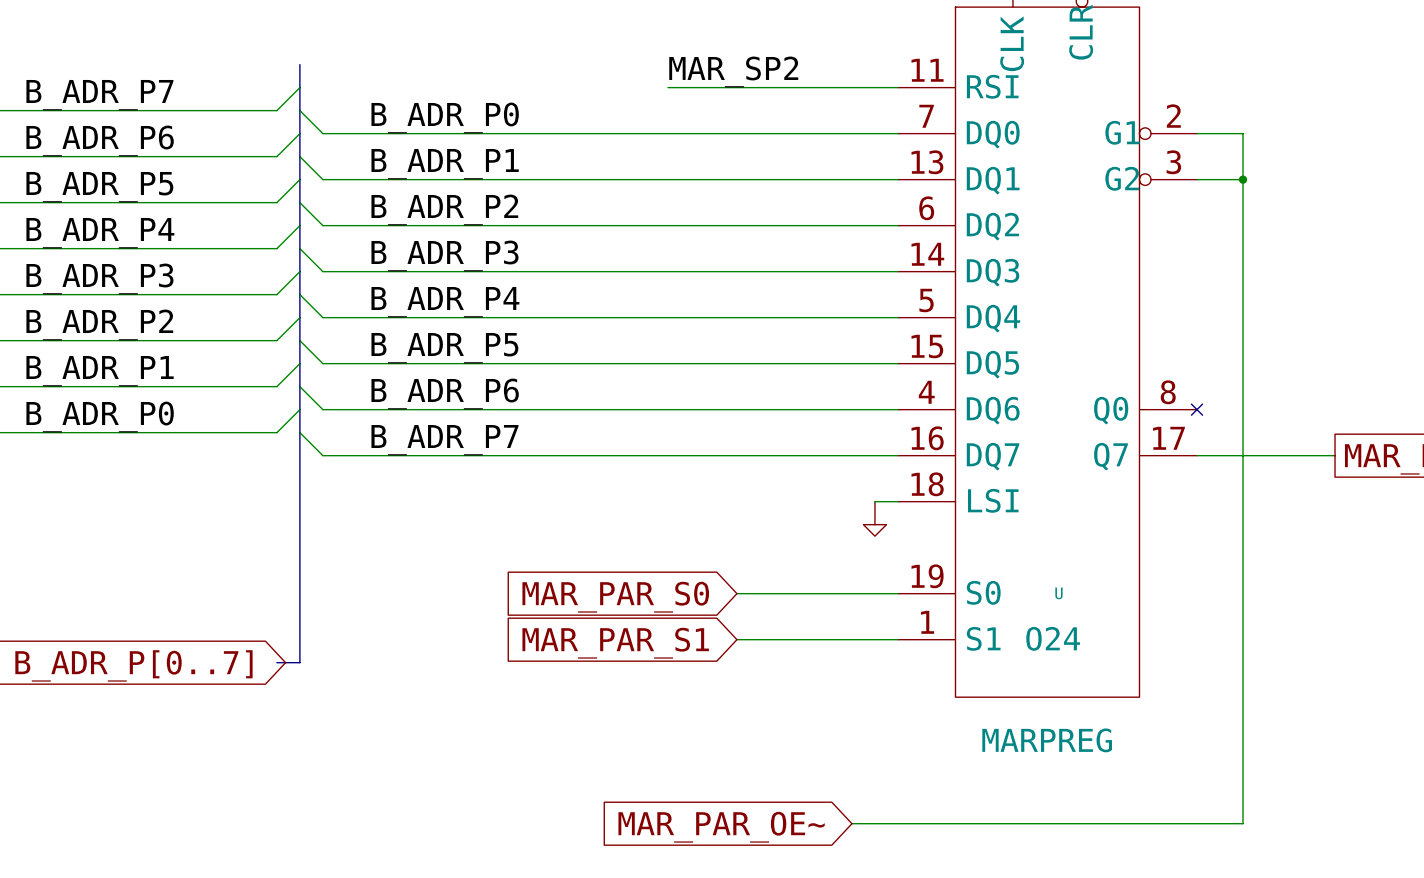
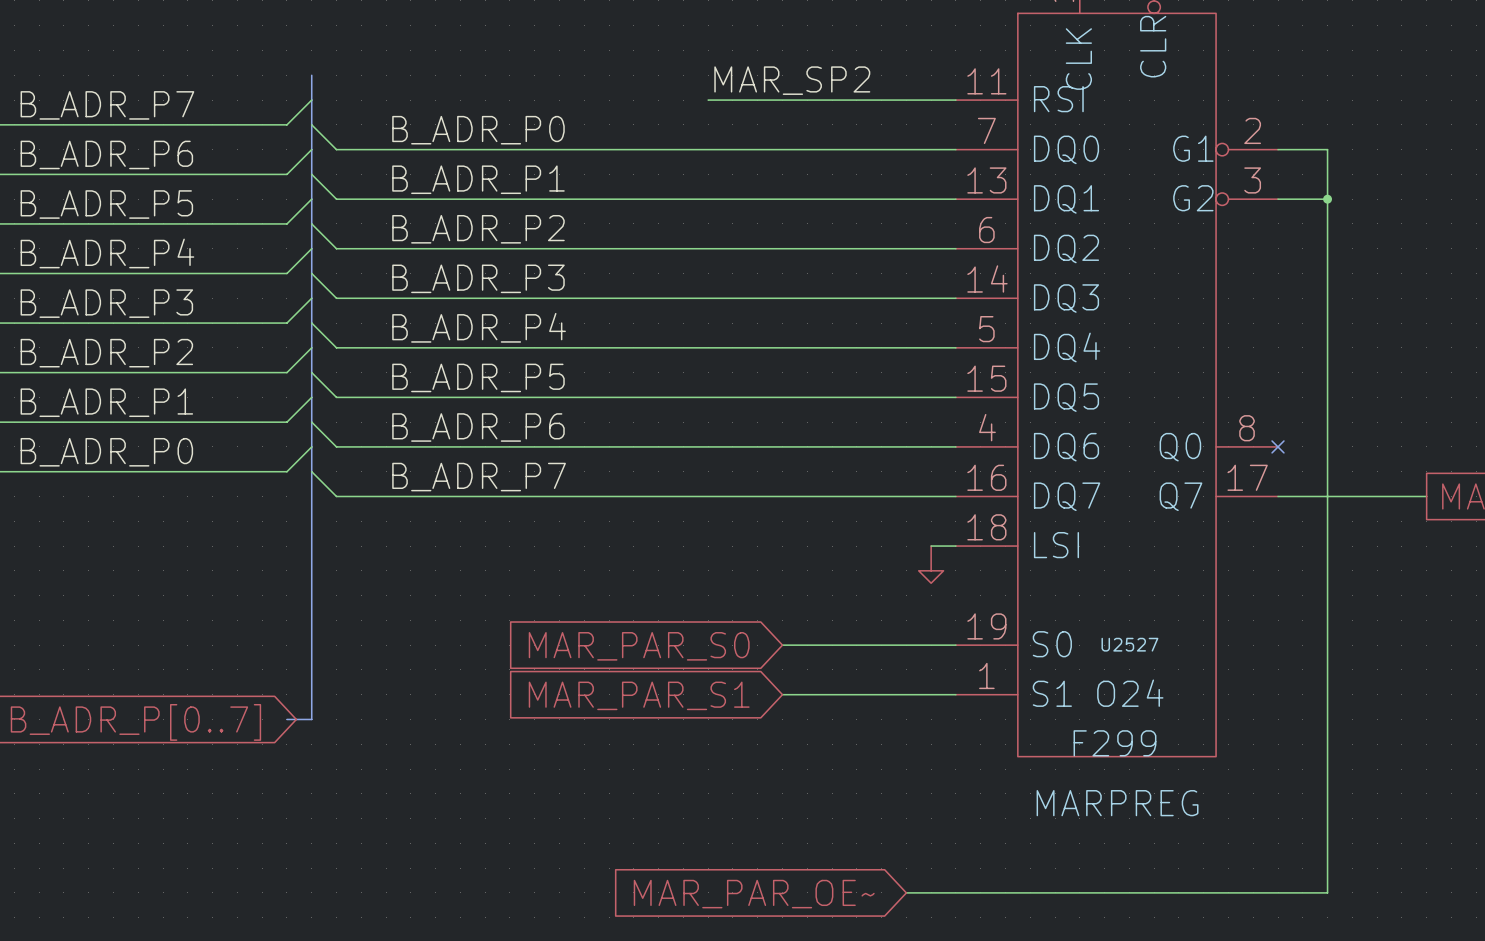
U name: U (1058, 593) -> U2527 (1129, 644)
U value: none -> F299 (1114, 743)

